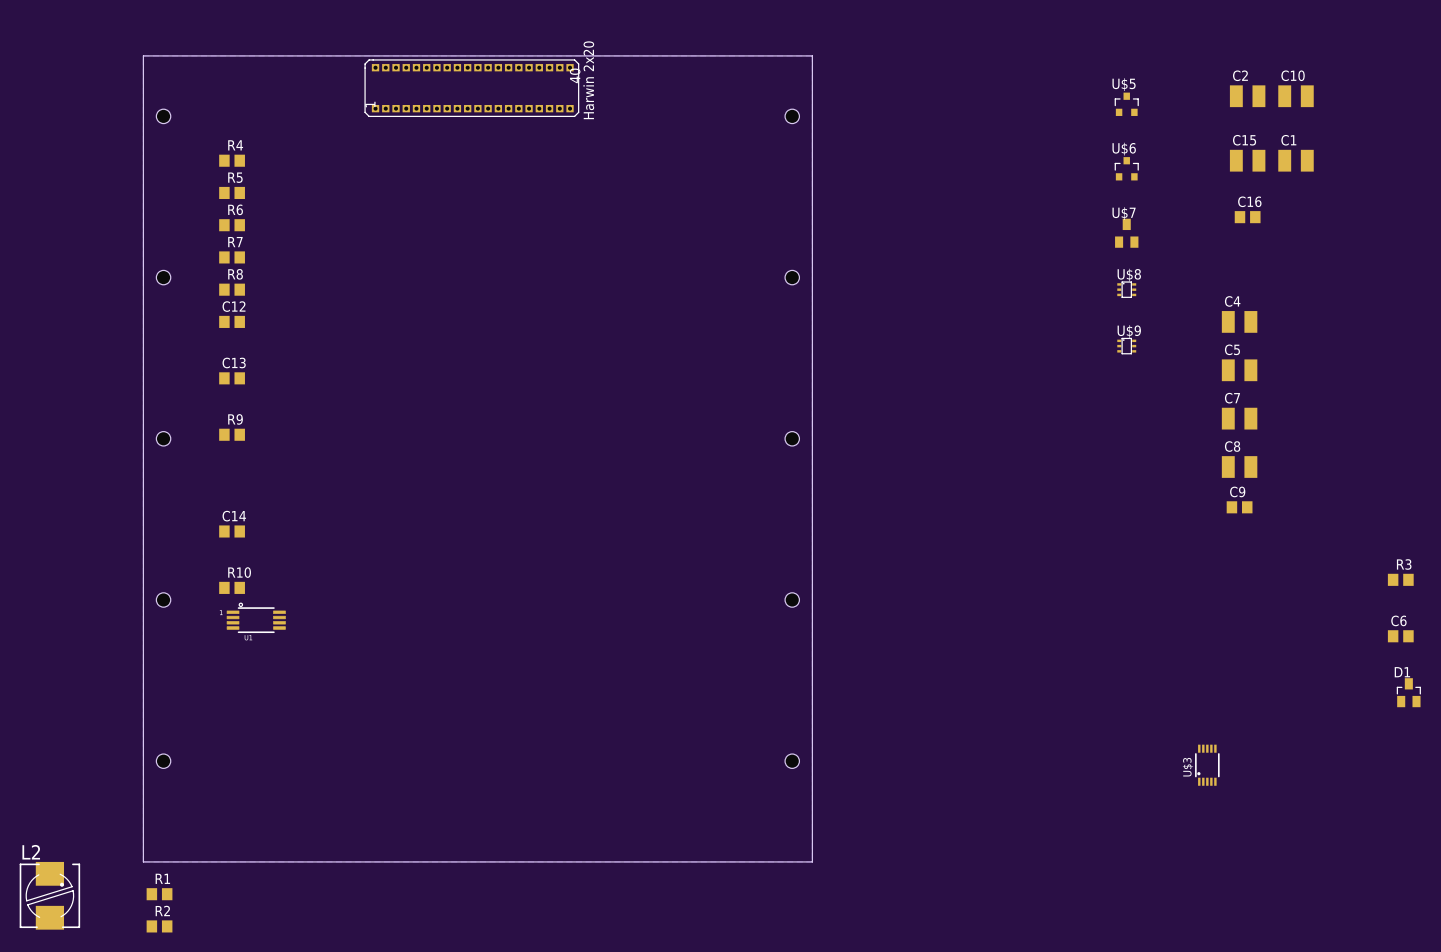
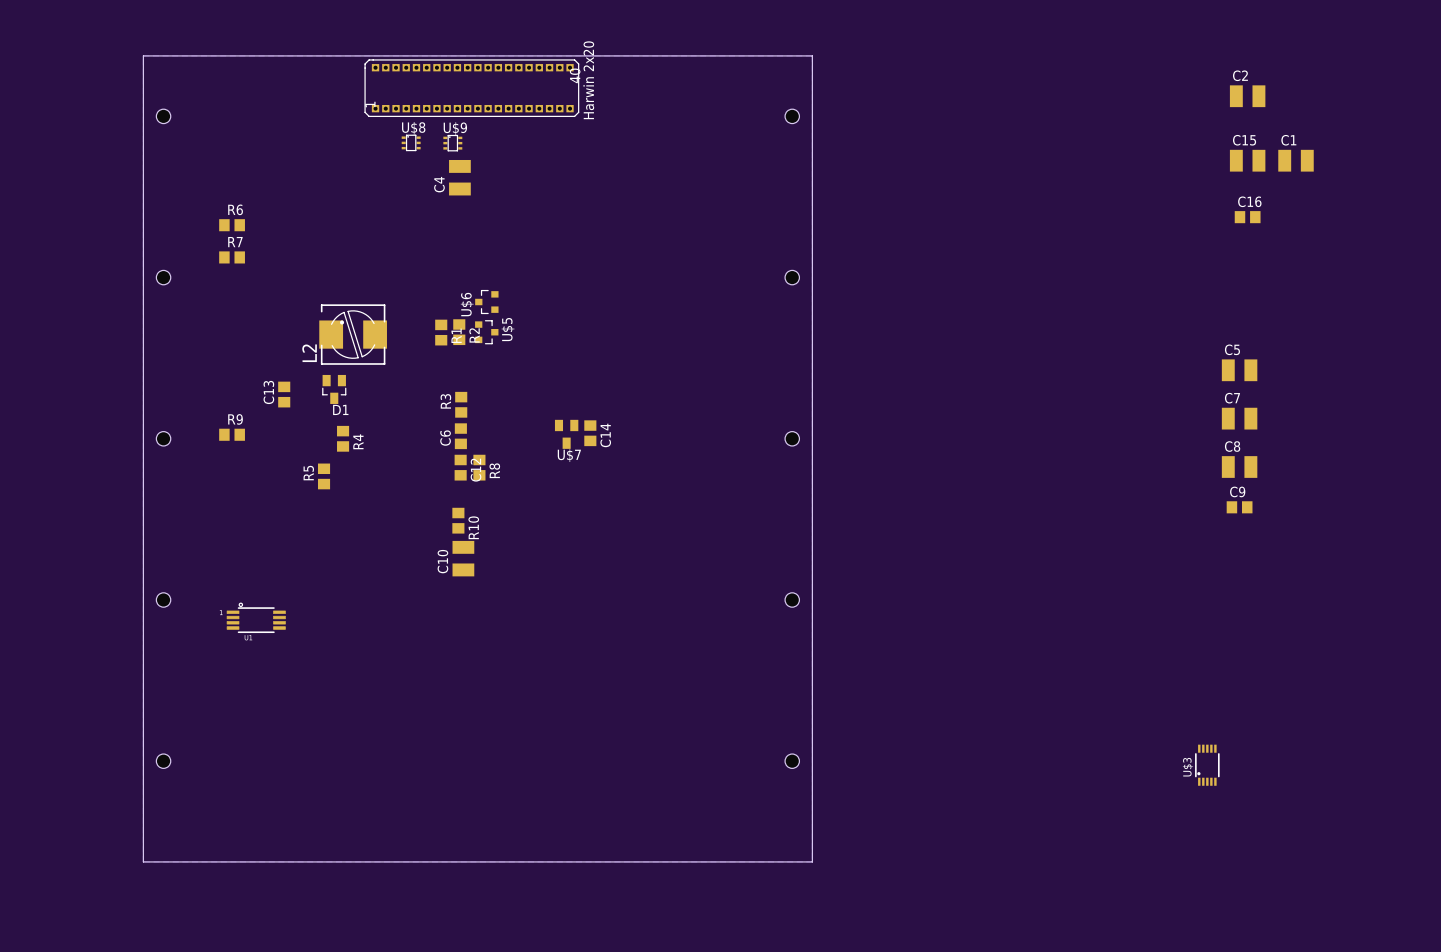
C10 name position: C10 (1293, 75) -> C10 (442, 561)
C10 rotation: 0° (1296, 96) -> 90° clockwise (463, 558)
C10 position: (1296, 96) -> (463, 558)
U$5 rotation: 0° (1126, 104) -> 90° clockwise (486, 332)
U$5 position: (1126, 104) -> (486, 332)
R4 rotation: 0° (232, 160) -> 90° clockwise (343, 438)
R4 position: (232, 160) -> (343, 438)
U$6 rotation: 0° (1126, 168) -> 90° counterclockwise (486, 302)
U$6 position: (1126, 168) -> (486, 302)
R5 name position: R5 (235, 177) -> R5 (308, 473)
R5 rotation: 0° (232, 192) -> 90° clockwise (324, 476)
R5 position: (232, 192) -> (324, 476)
U$7 rotation: 0° (1126, 233) -> 180° (566, 434)
U$7 position: (1126, 233) -> (566, 434)
R8 rotation: 0° (232, 289) -> 90° clockwise (479, 467)
R8 position: (232, 289) -> (479, 467)
U$8 position: (1126, 289) -> (411, 142)
C4 name position: C4 (1232, 301) -> C4 (439, 184)
C12 rotation: 0° (232, 321) -> 90° clockwise (460, 467)
C12 position: (232, 321) -> (460, 467)
C4 rotation: 0° (1239, 321) -> 90° clockwise (459, 177)
C4 position: (1239, 321) -> (459, 177)
U$9 position: (1126, 346) -> (452, 143)
C13 name position: C13 (234, 362) -> C13 (268, 392)
C13 rotation: 0° (232, 378) -> 90° clockwise (284, 394)
C13 position: (232, 378) -> (284, 394)
C14 rotation: 0° (232, 531) -> 90° clockwise (590, 433)
C14 position: (232, 531) -> (590, 433)
R3 name position: R3 (1404, 564) -> R3 (445, 401)
R3 rotation: 0° (1400, 579) -> 90° clockwise (461, 404)
R3 position: (1400, 579) -> (461, 404)
R10 rotation: 0° (232, 587) -> 90° clockwise (458, 520)
R10 position: (232, 587) -> (458, 520)
C6 name position: C6 (1398, 620) -> C6 (445, 438)
C6 rotation: 0° (1400, 636) -> 90° clockwise (460, 436)
C6 position: (1400, 636) -> (460, 436)
D1 rotation: 0° (1408, 692) -> 180° (334, 389)
D1 position: (1408, 692) -> (334, 389)
R1 rotation: 0° (159, 894) -> 90° clockwise (441, 332)
R1 position: (159, 894) -> (441, 332)
L2 rotation: 0° (49, 895) -> 90° counterclockwise (353, 334)
L2 position: (49, 895) -> (353, 334)
R2 rotation: 0° (159, 926) -> 90° clockwise (459, 332)
R2 position: (159, 926) -> (459, 332)

